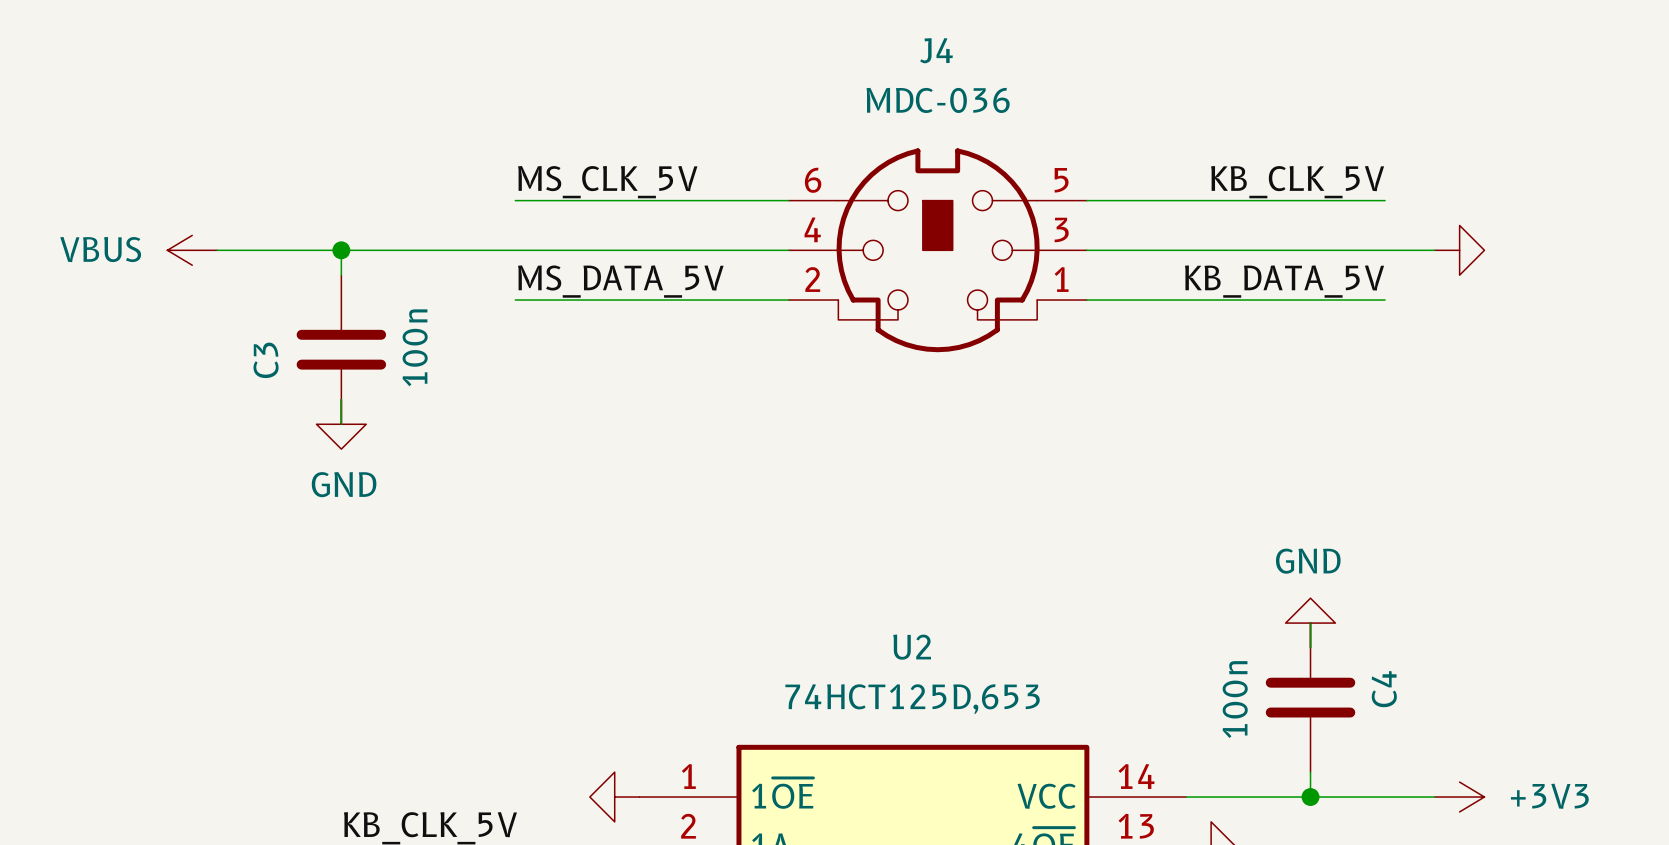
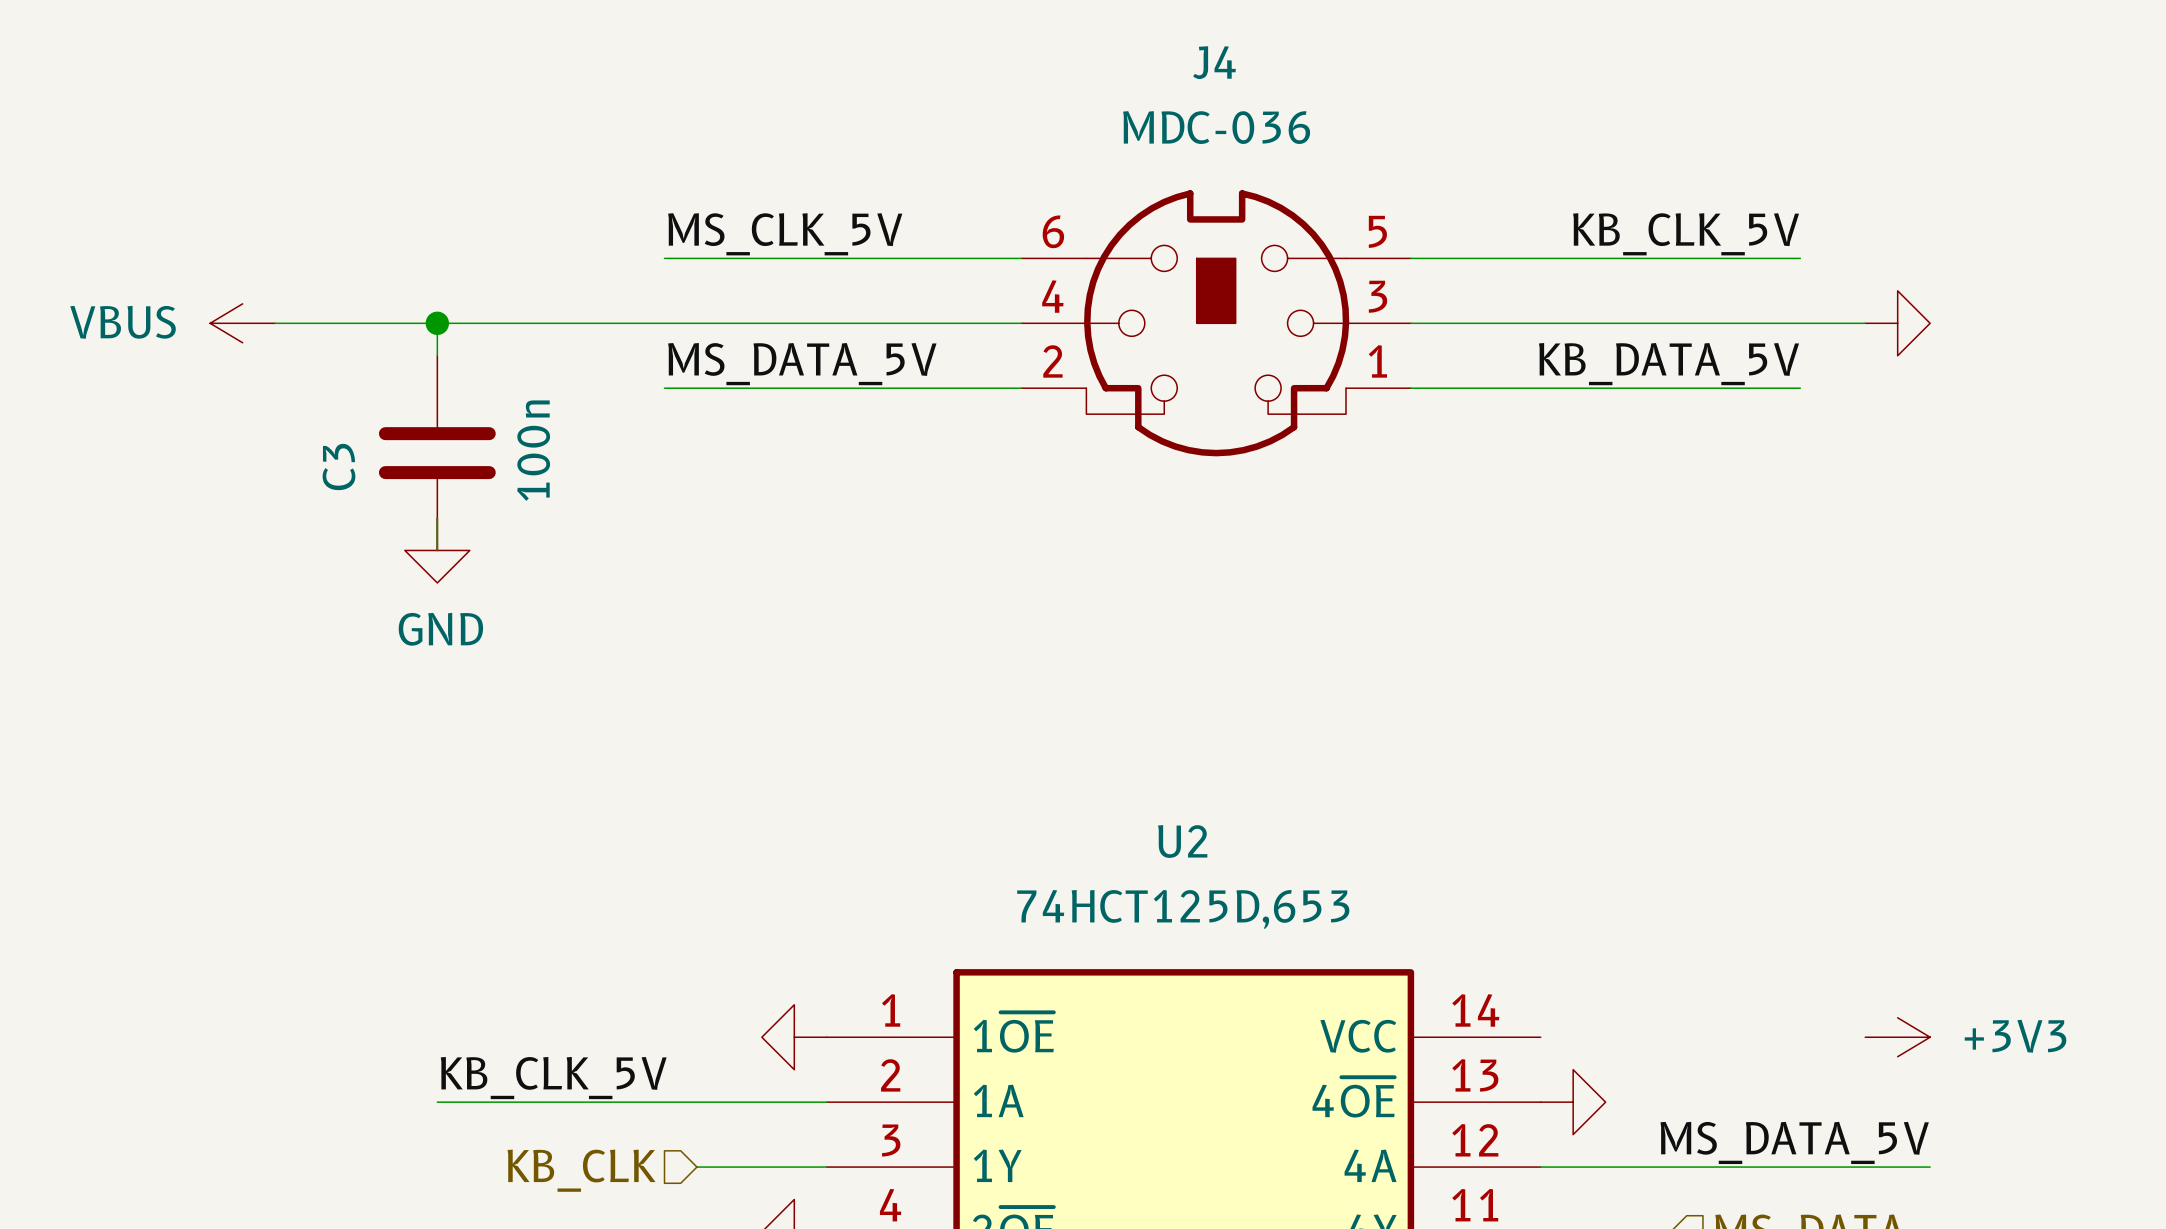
wire: (1310, 623) (1310, 647) -> none
power symbol: GND (1310, 623) -> none
C4: 100n (1310, 697) -> none
wire: (1310, 772) (1310, 797) -> none
wire: (1186, 797) (1434, 797) -> none
junction: (1310, 797) -> none

